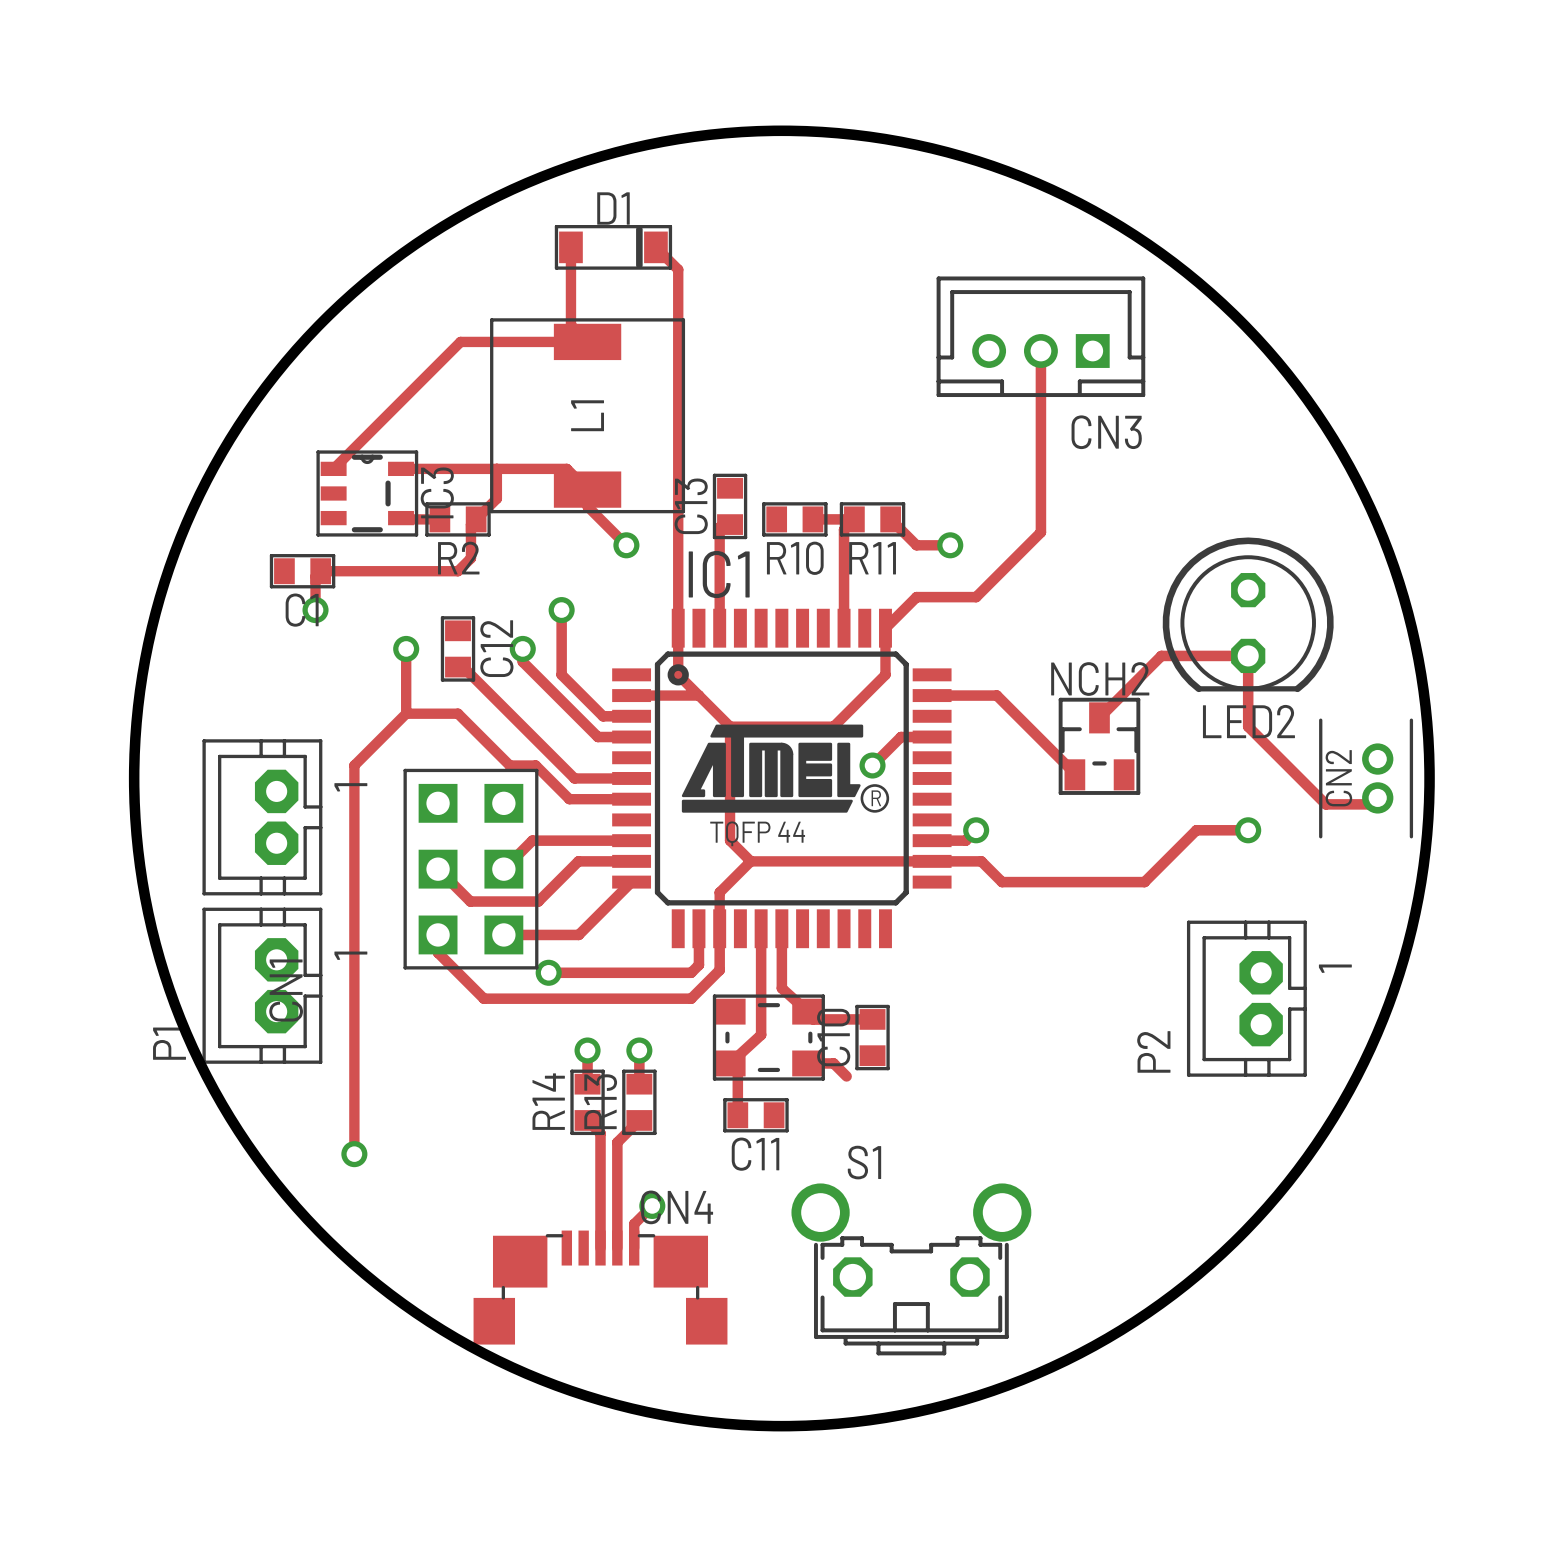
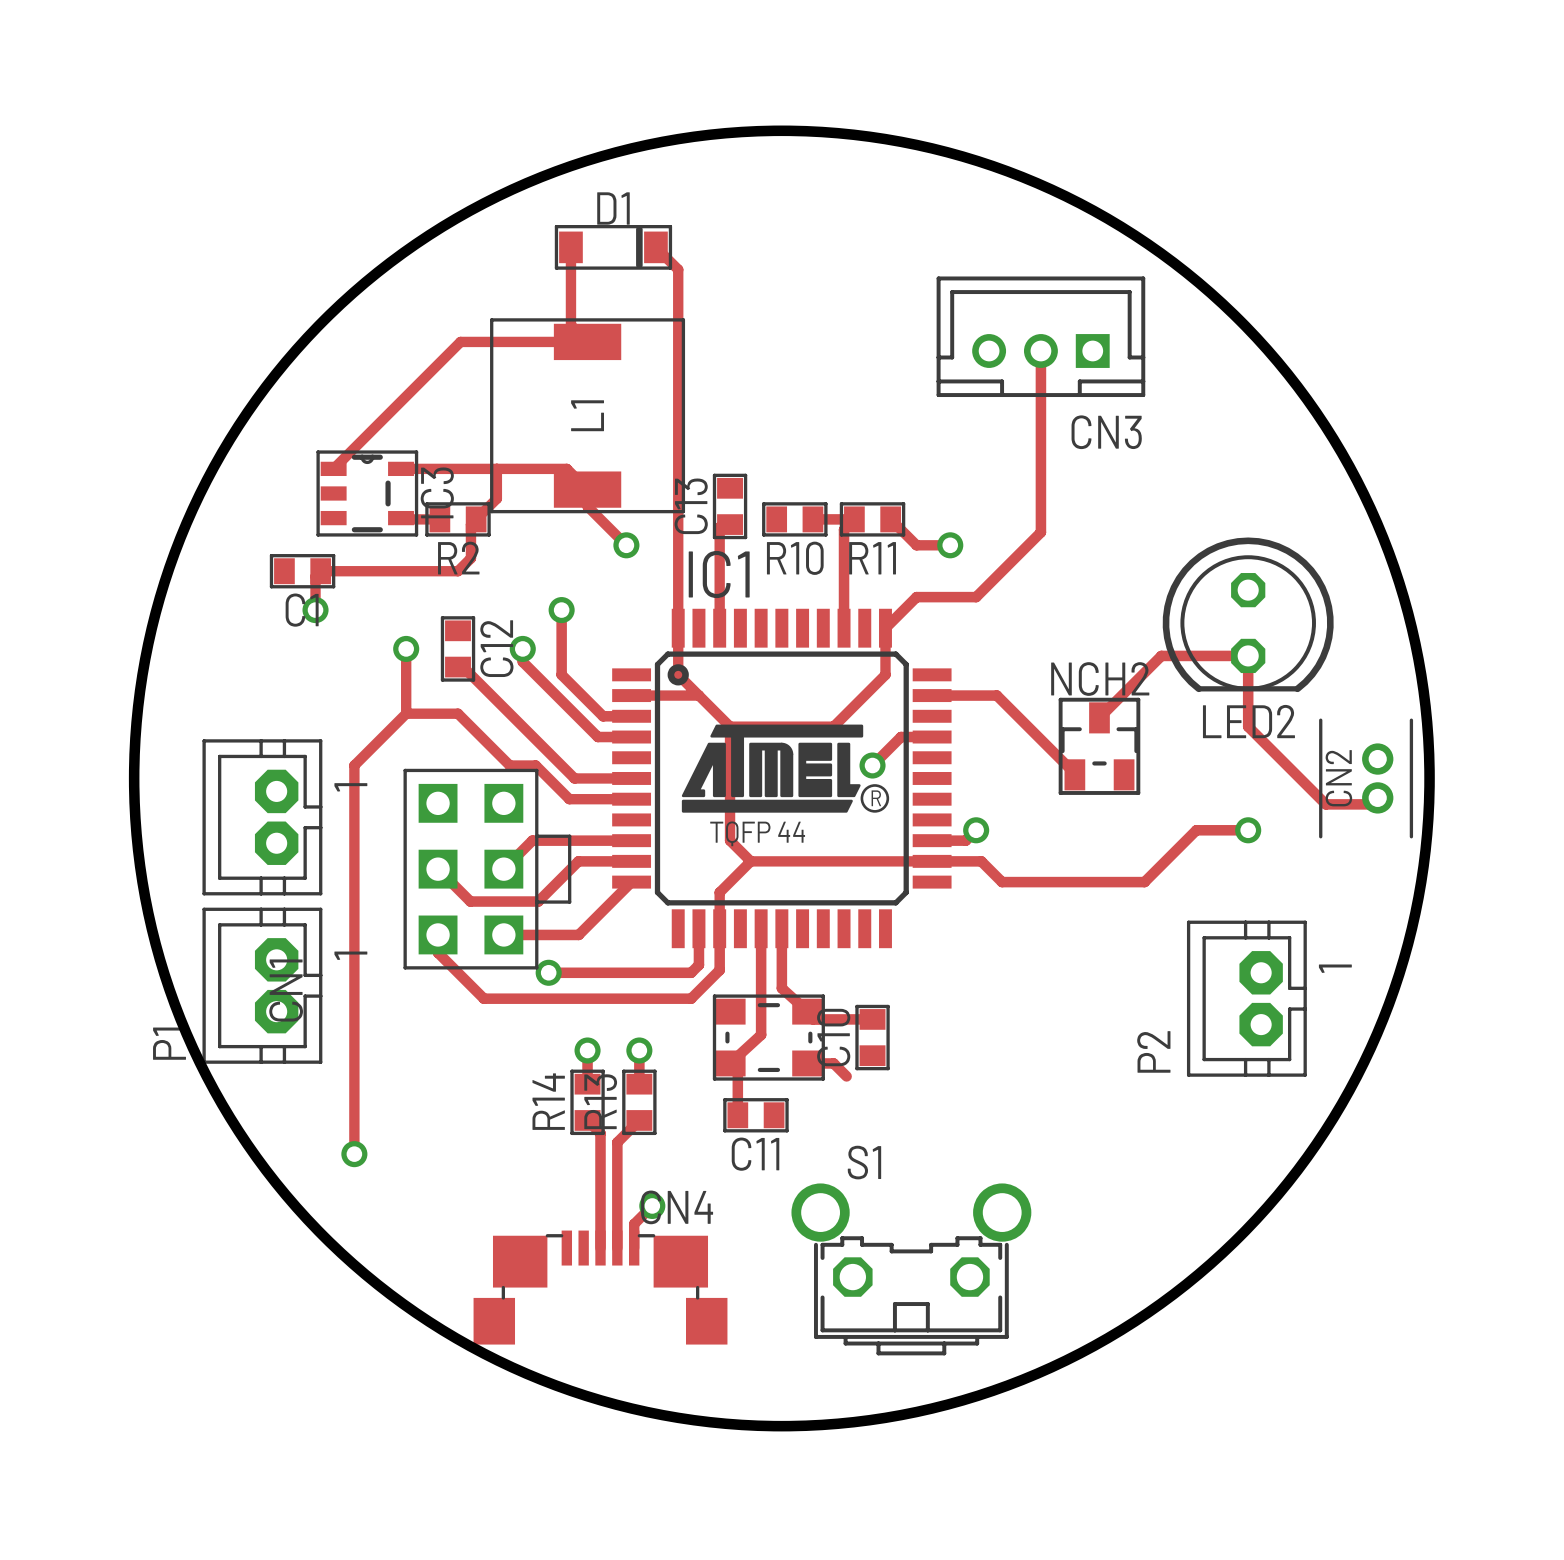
part footprint: [403, 768, 539, 970] -> [403, 768, 572, 970]

